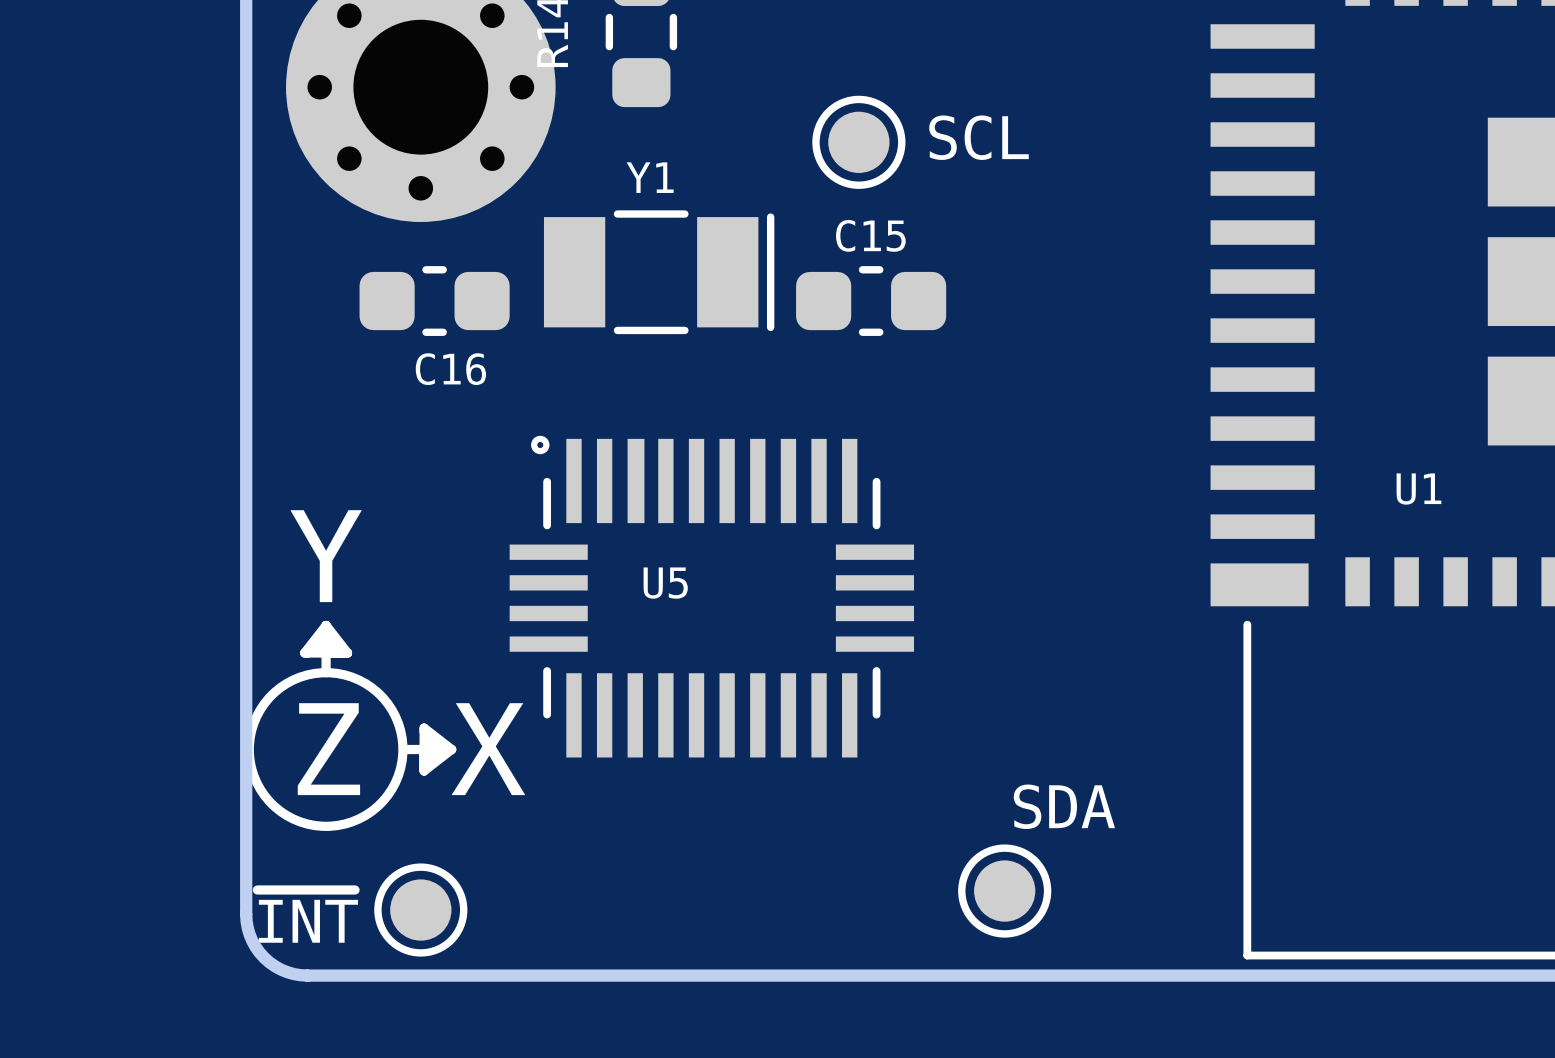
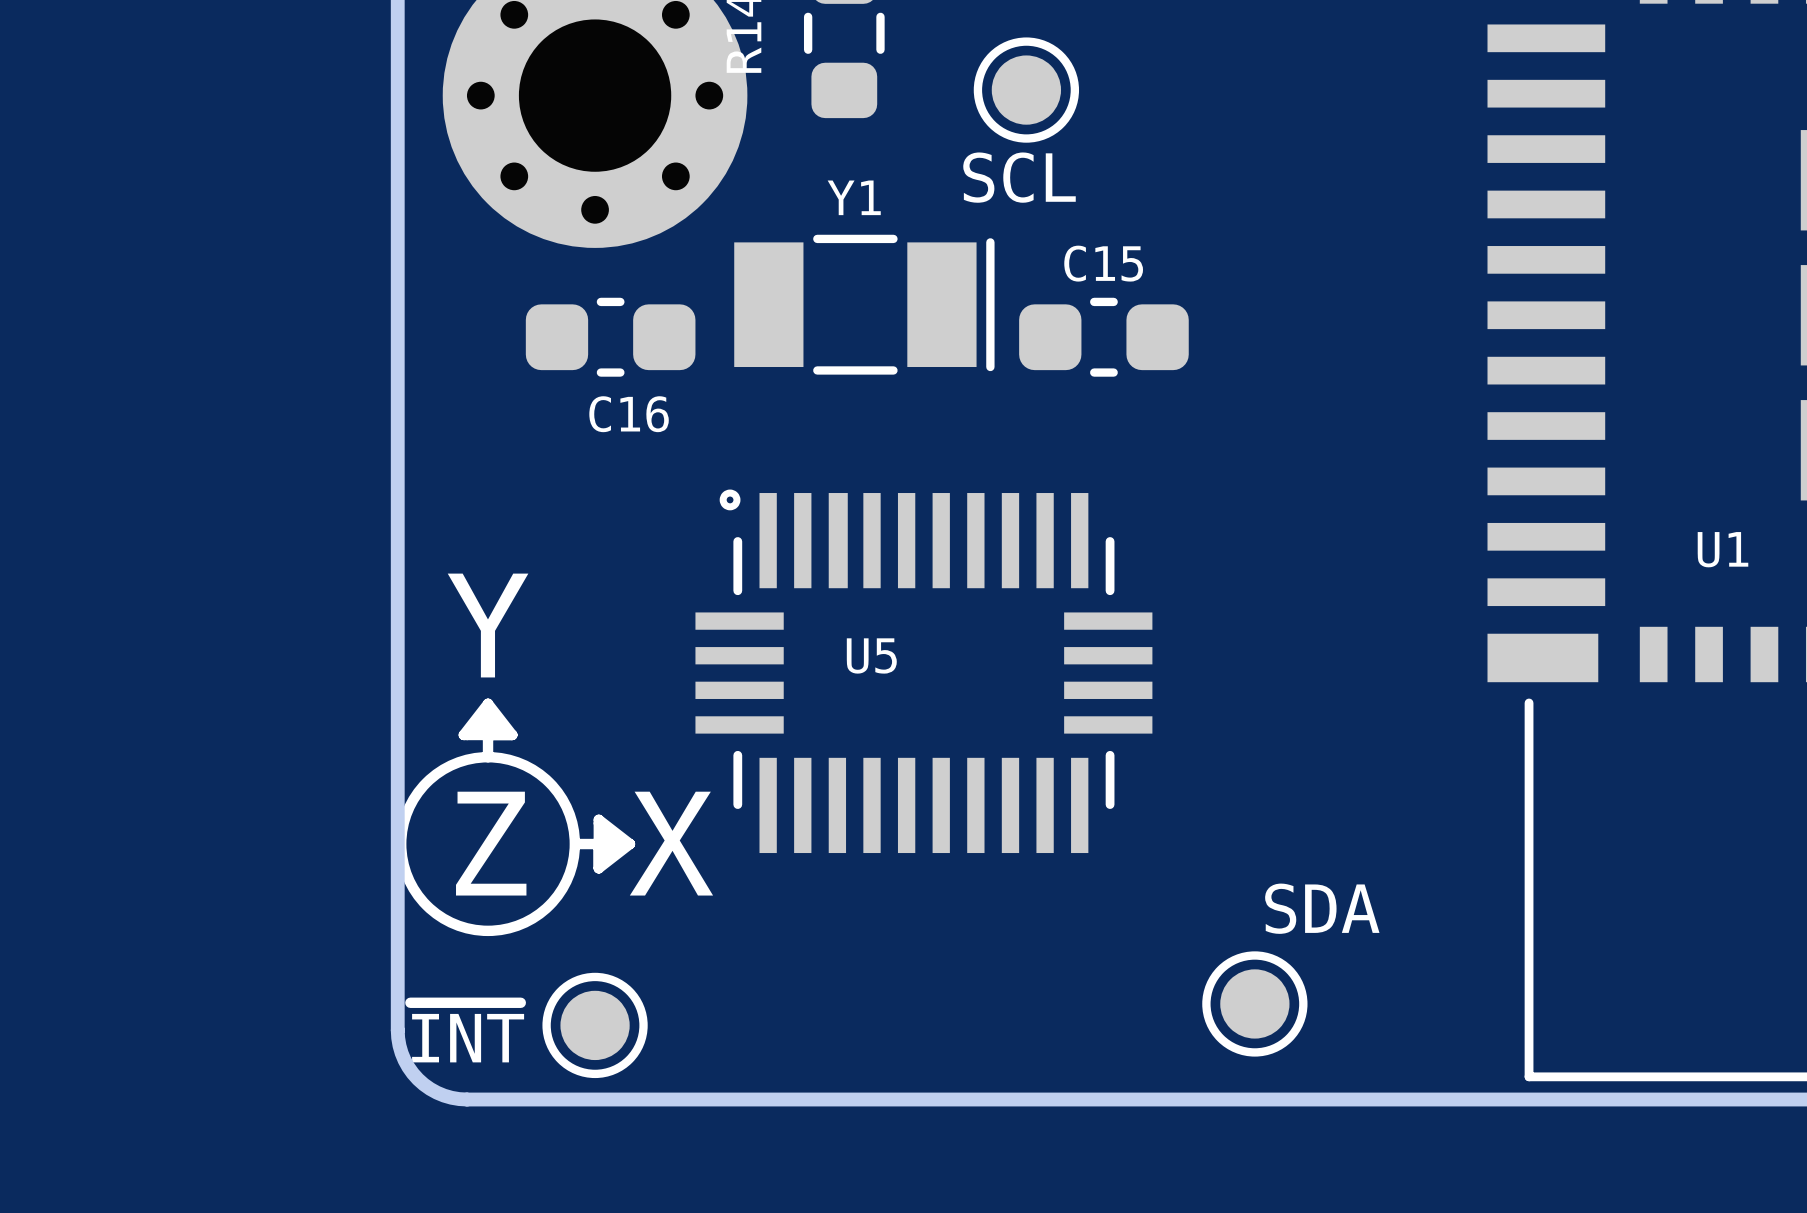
text position: SCL (978, 137) -> SCL (1019, 177)
part position: (858, 142) -> (1026, 90)

